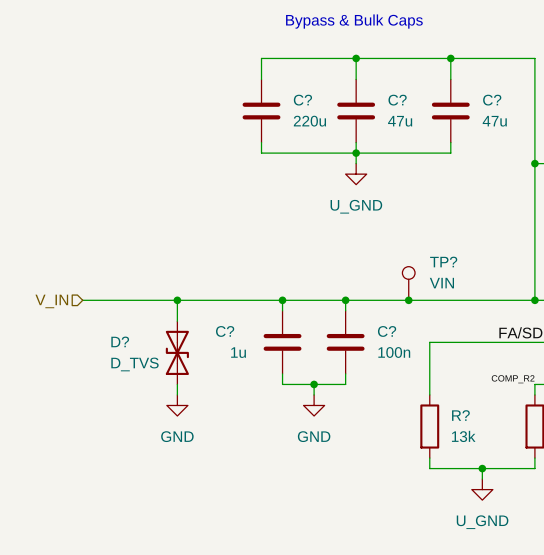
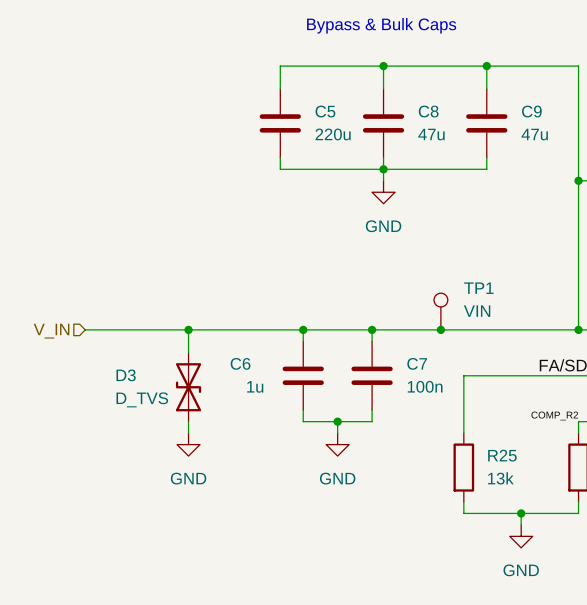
C? name: C? (302, 100) -> C5 (325, 111)
C? name: C? (397, 100) -> C8 (428, 111)
C? name: C? (492, 100) -> C9 (531, 111)
power symbol: U_GND (356, 174) -> GND (383, 192)
TP? name: TP? (443, 261) -> TP1 (478, 288)
C? name: C? (225, 331) -> C6 (240, 363)
C? name: C? (387, 331) -> C7 (417, 363)
D? name: D? (120, 341) -> D3 (126, 375)
R? name: R? (460, 415) -> R25 (502, 455)
power symbol: U_GND (482, 489) -> GND (521, 536)

